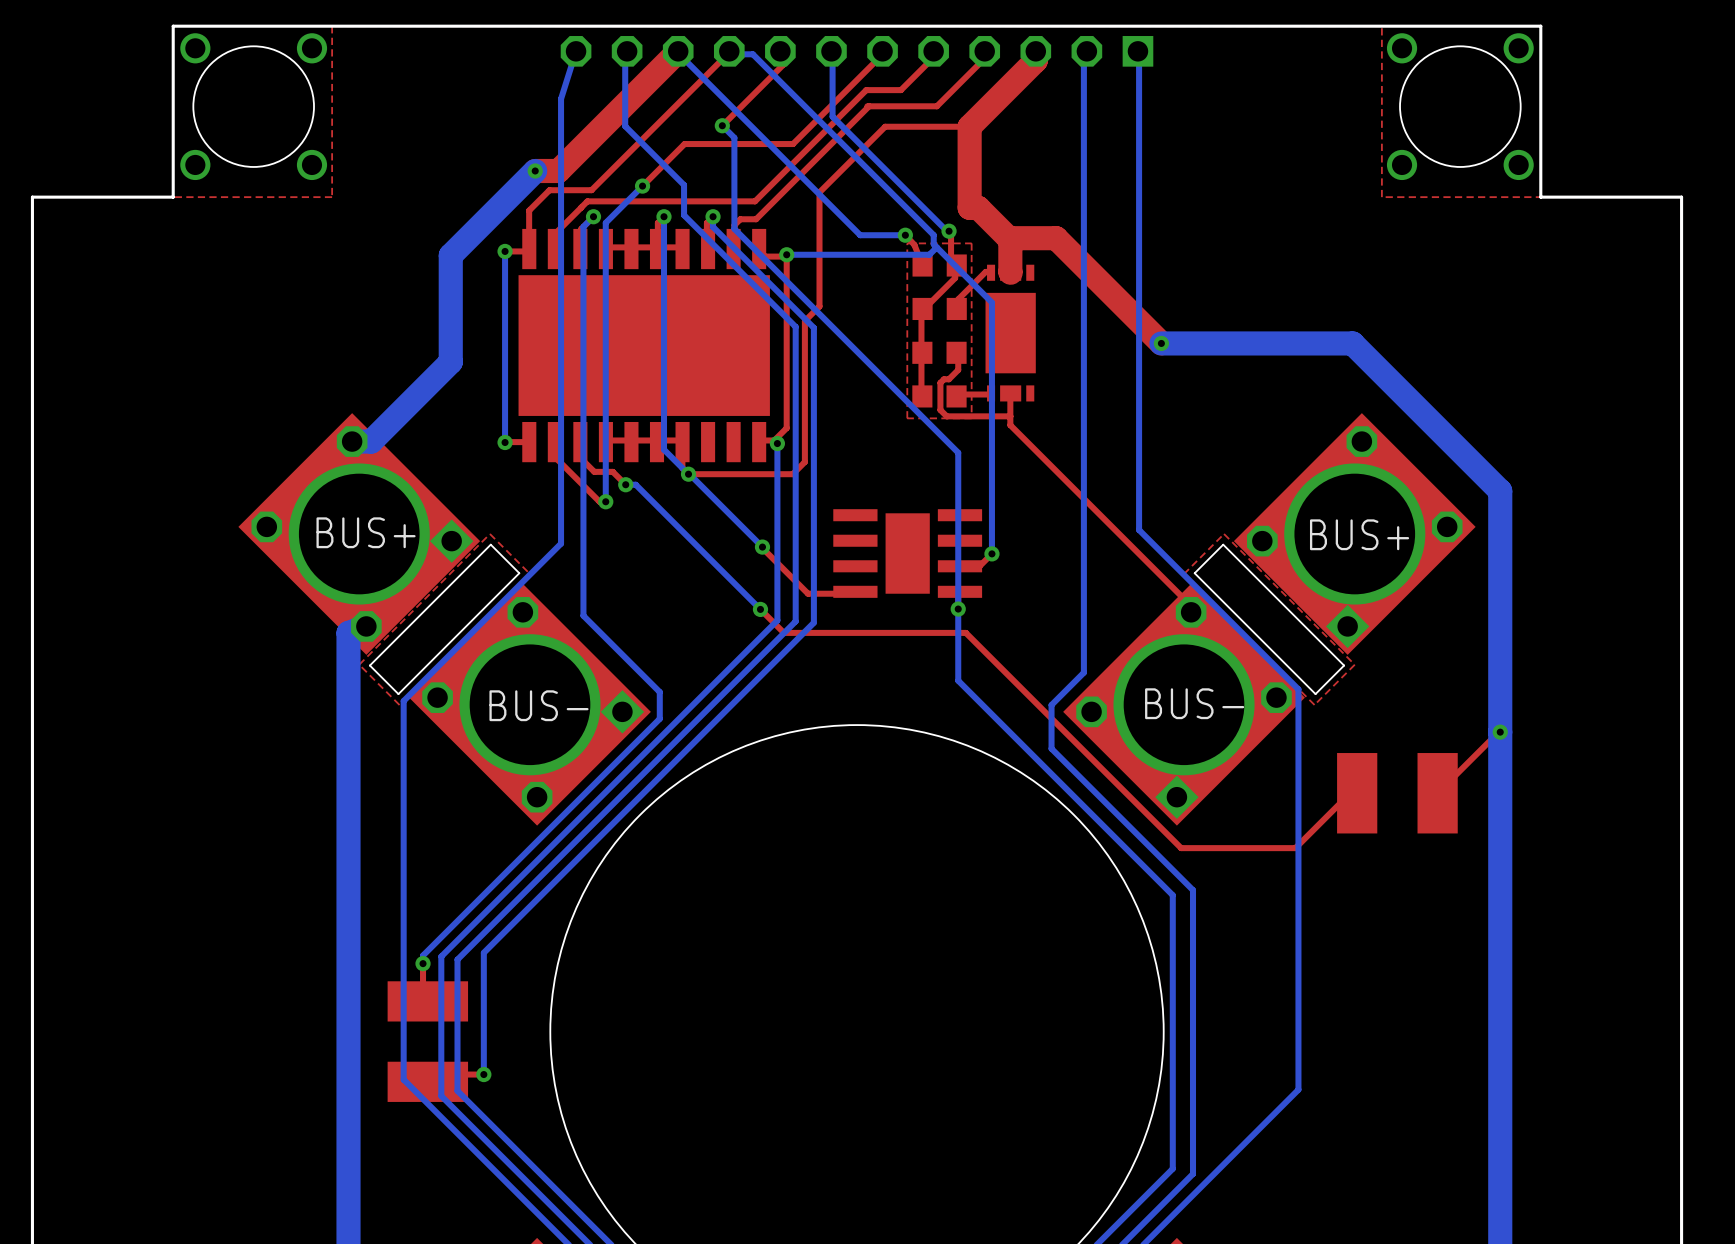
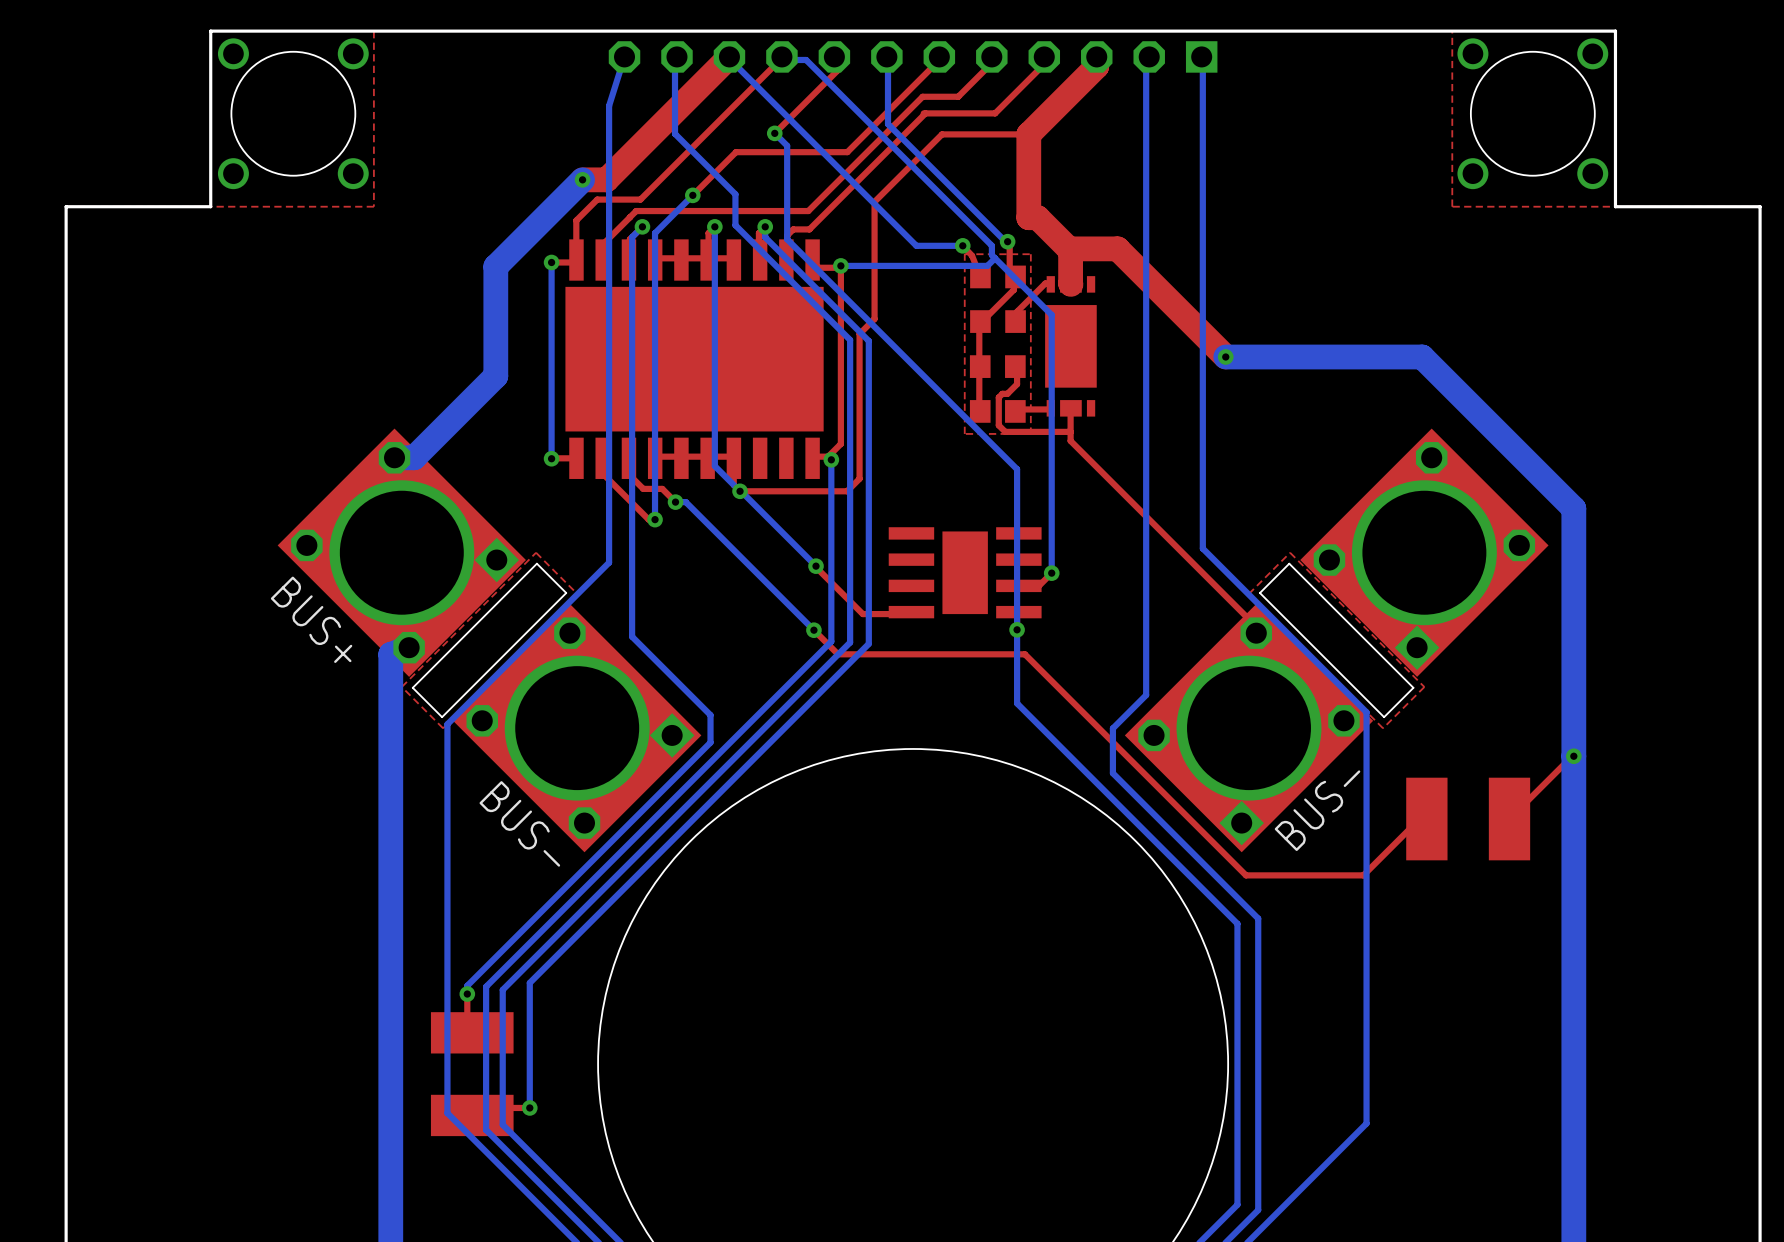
text rotation: 0° (366, 532) -> 45° clockwise (311, 619)
text: BUS+ (1359, 534) -> none
text rotation: 0° (1194, 703) -> 45° counterclockwise (1317, 810)
text rotation: 0° (539, 705) -> 45° clockwise (519, 823)

